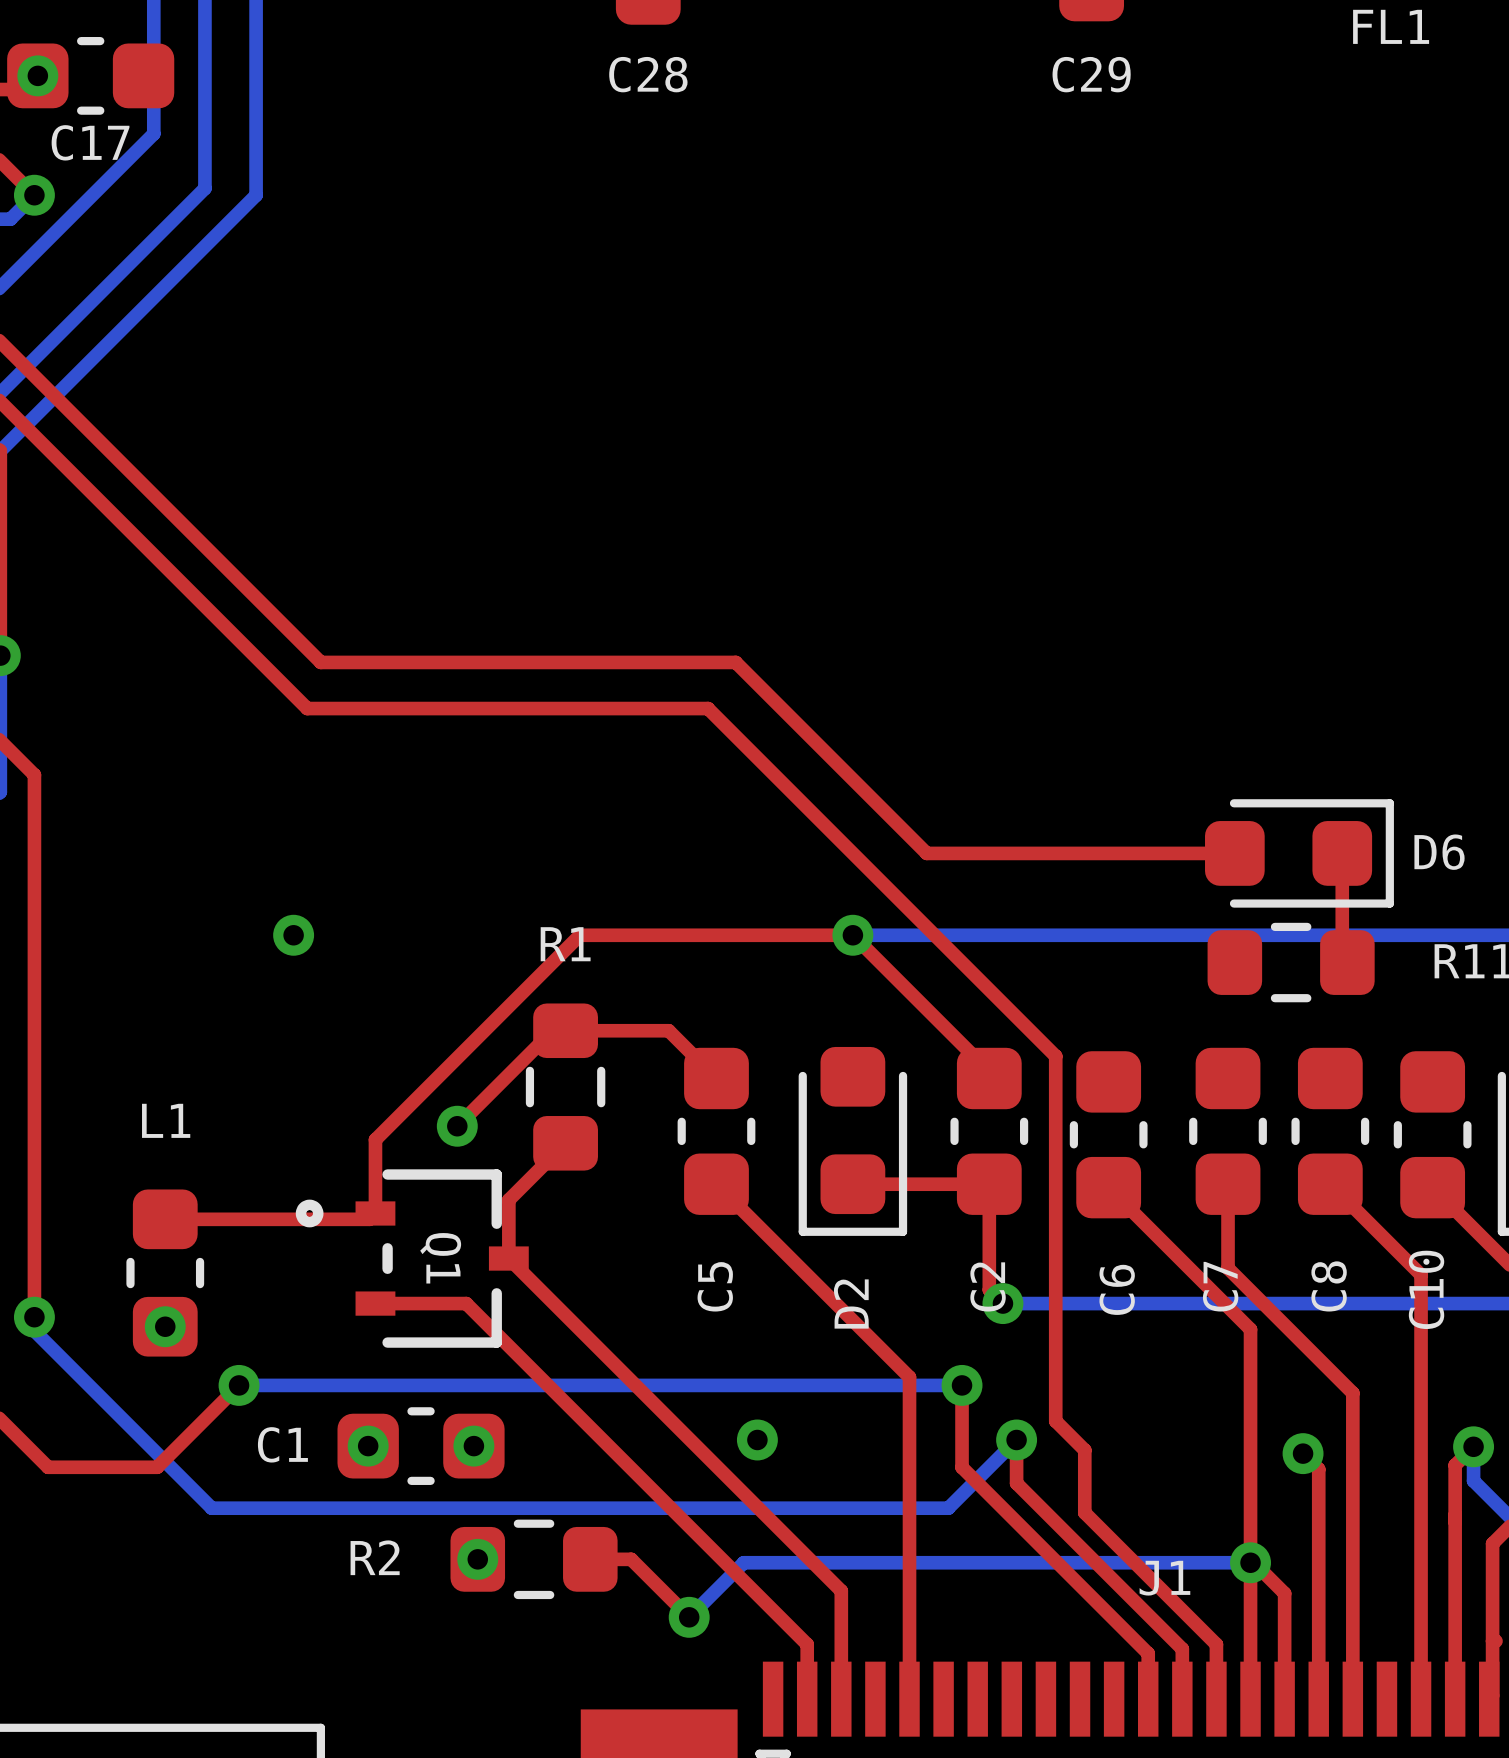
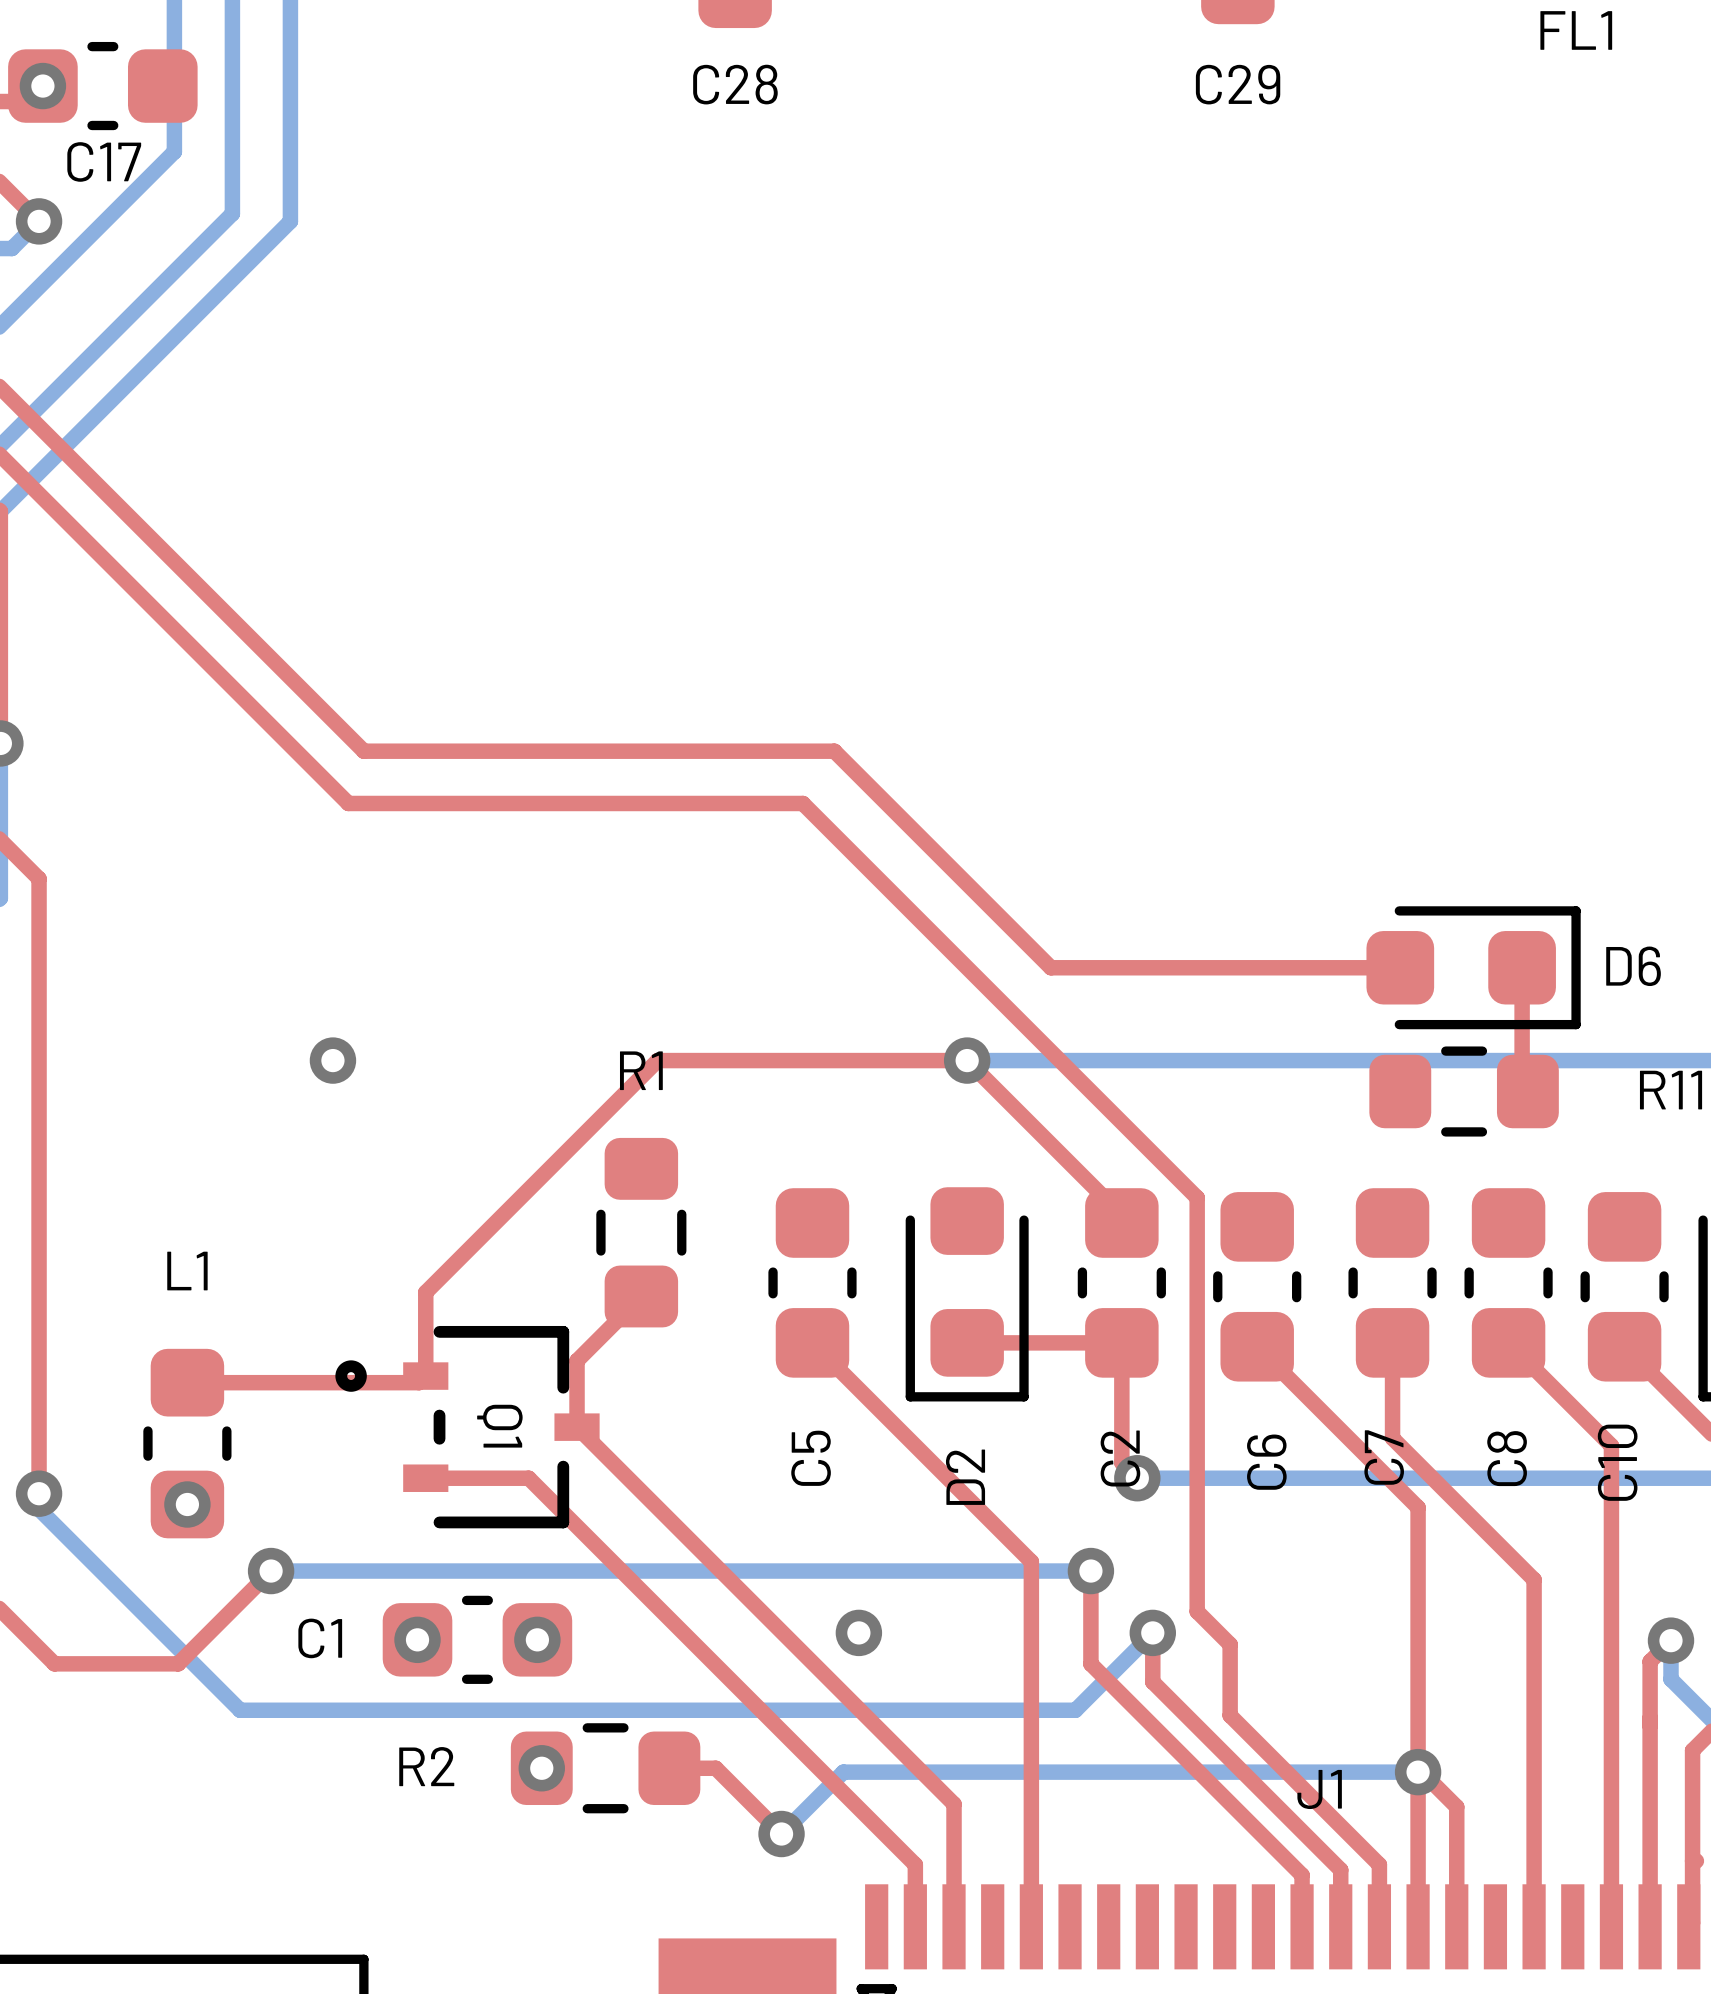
top track: (716, 1078) (668, 1030) (552, 1030) (457, 1126) -> none
via: (457, 1126) -> none
top track: (1303, 1453) (1318, 1469) (1318, 1699) -> none
via: (1303, 1453) -> none

